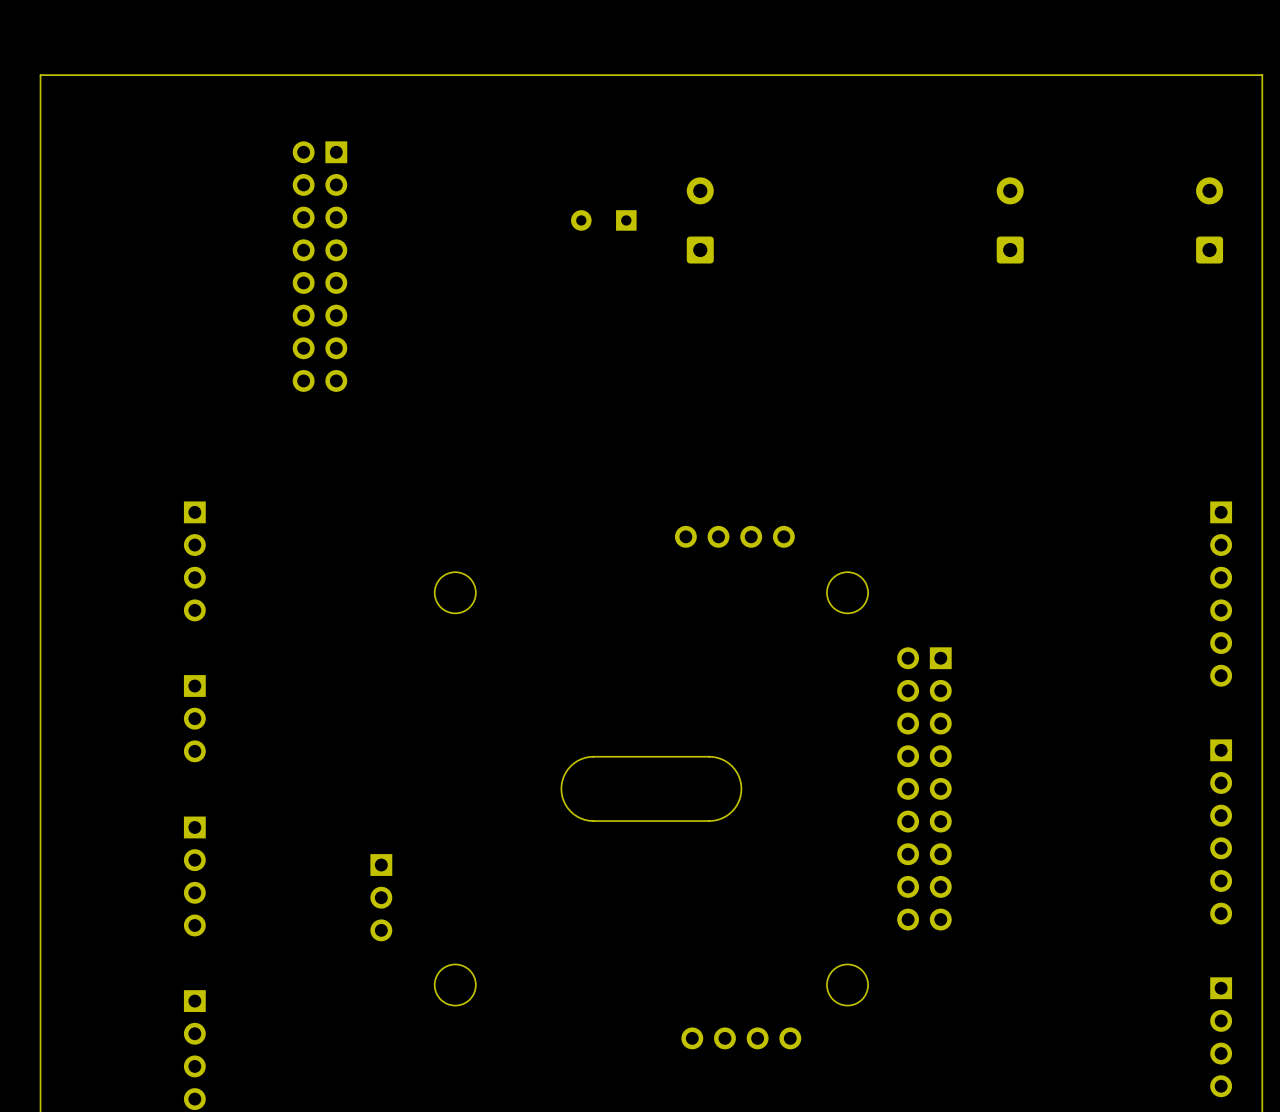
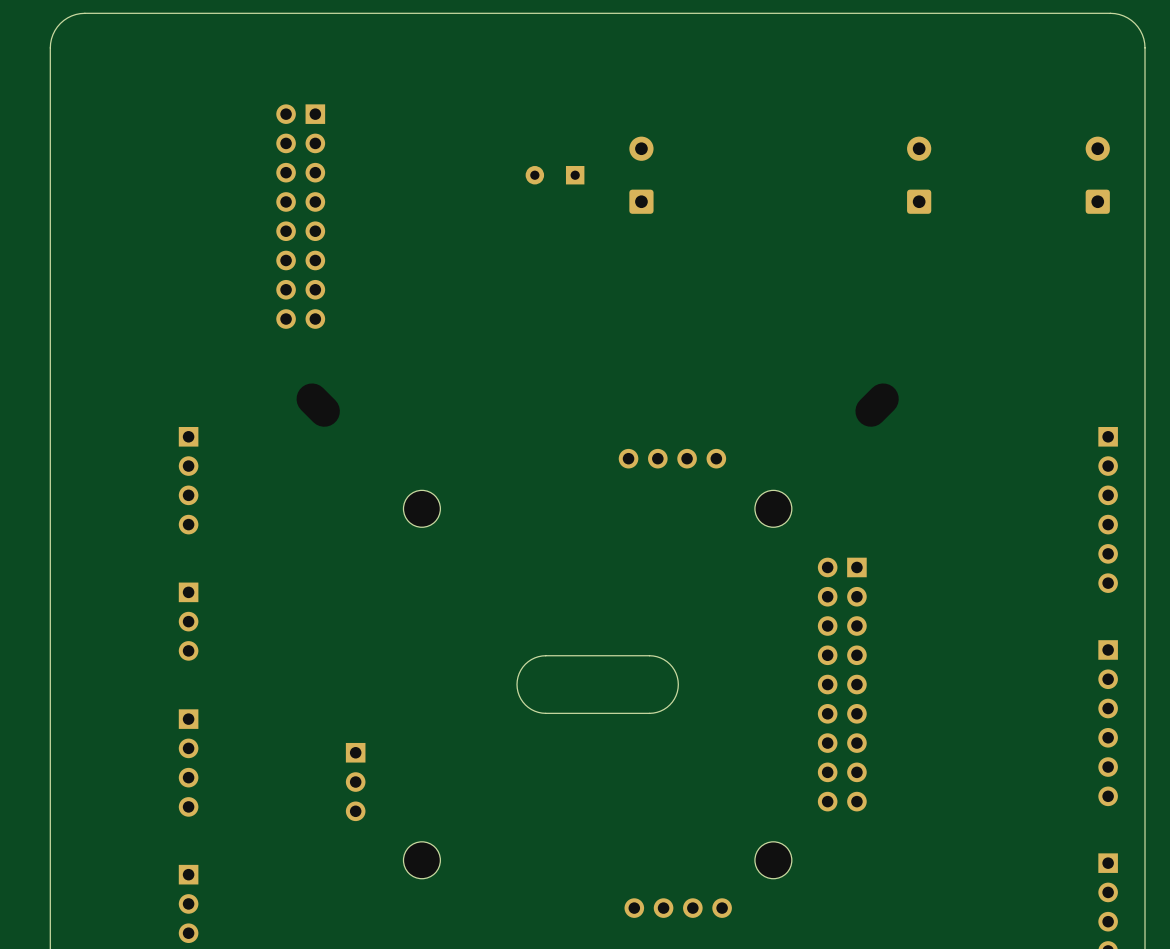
board edge: (1262, 78) (1262, 75) (40, 75) (40, 78) -> (1145, 47) (1142, 34) (1134, 23) (1123, 15) (1110, 13) (84, 13) (71, 15) (60, 23) (52, 34) (50, 47)

